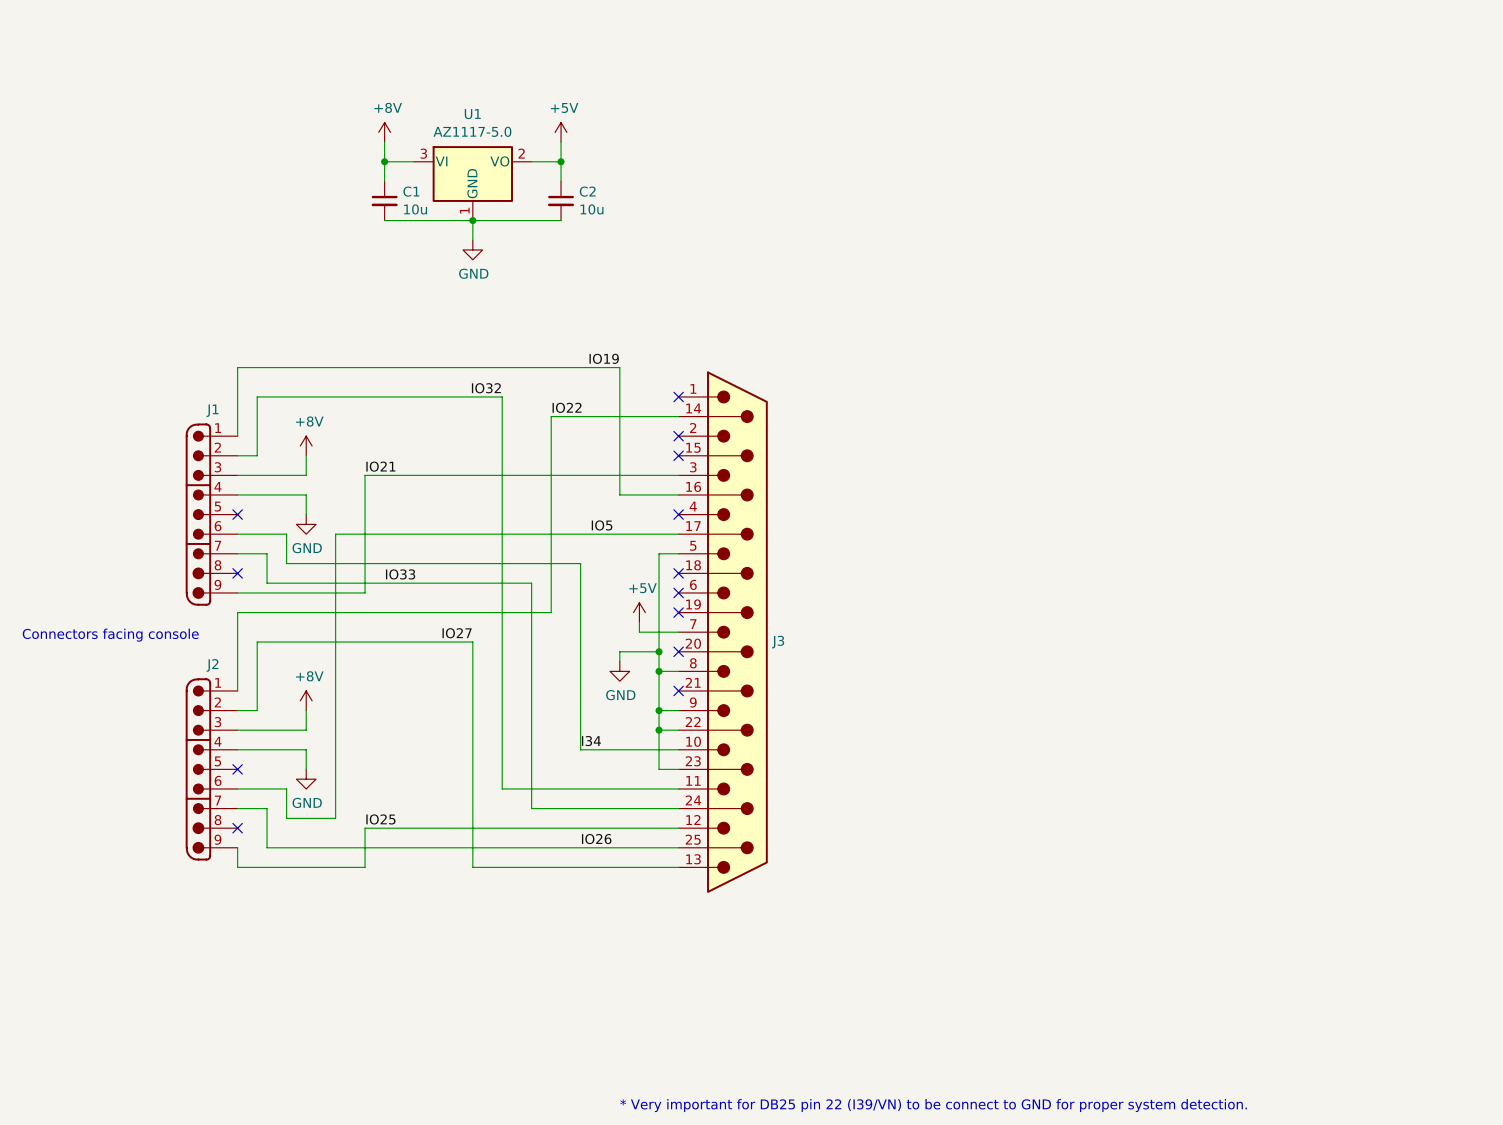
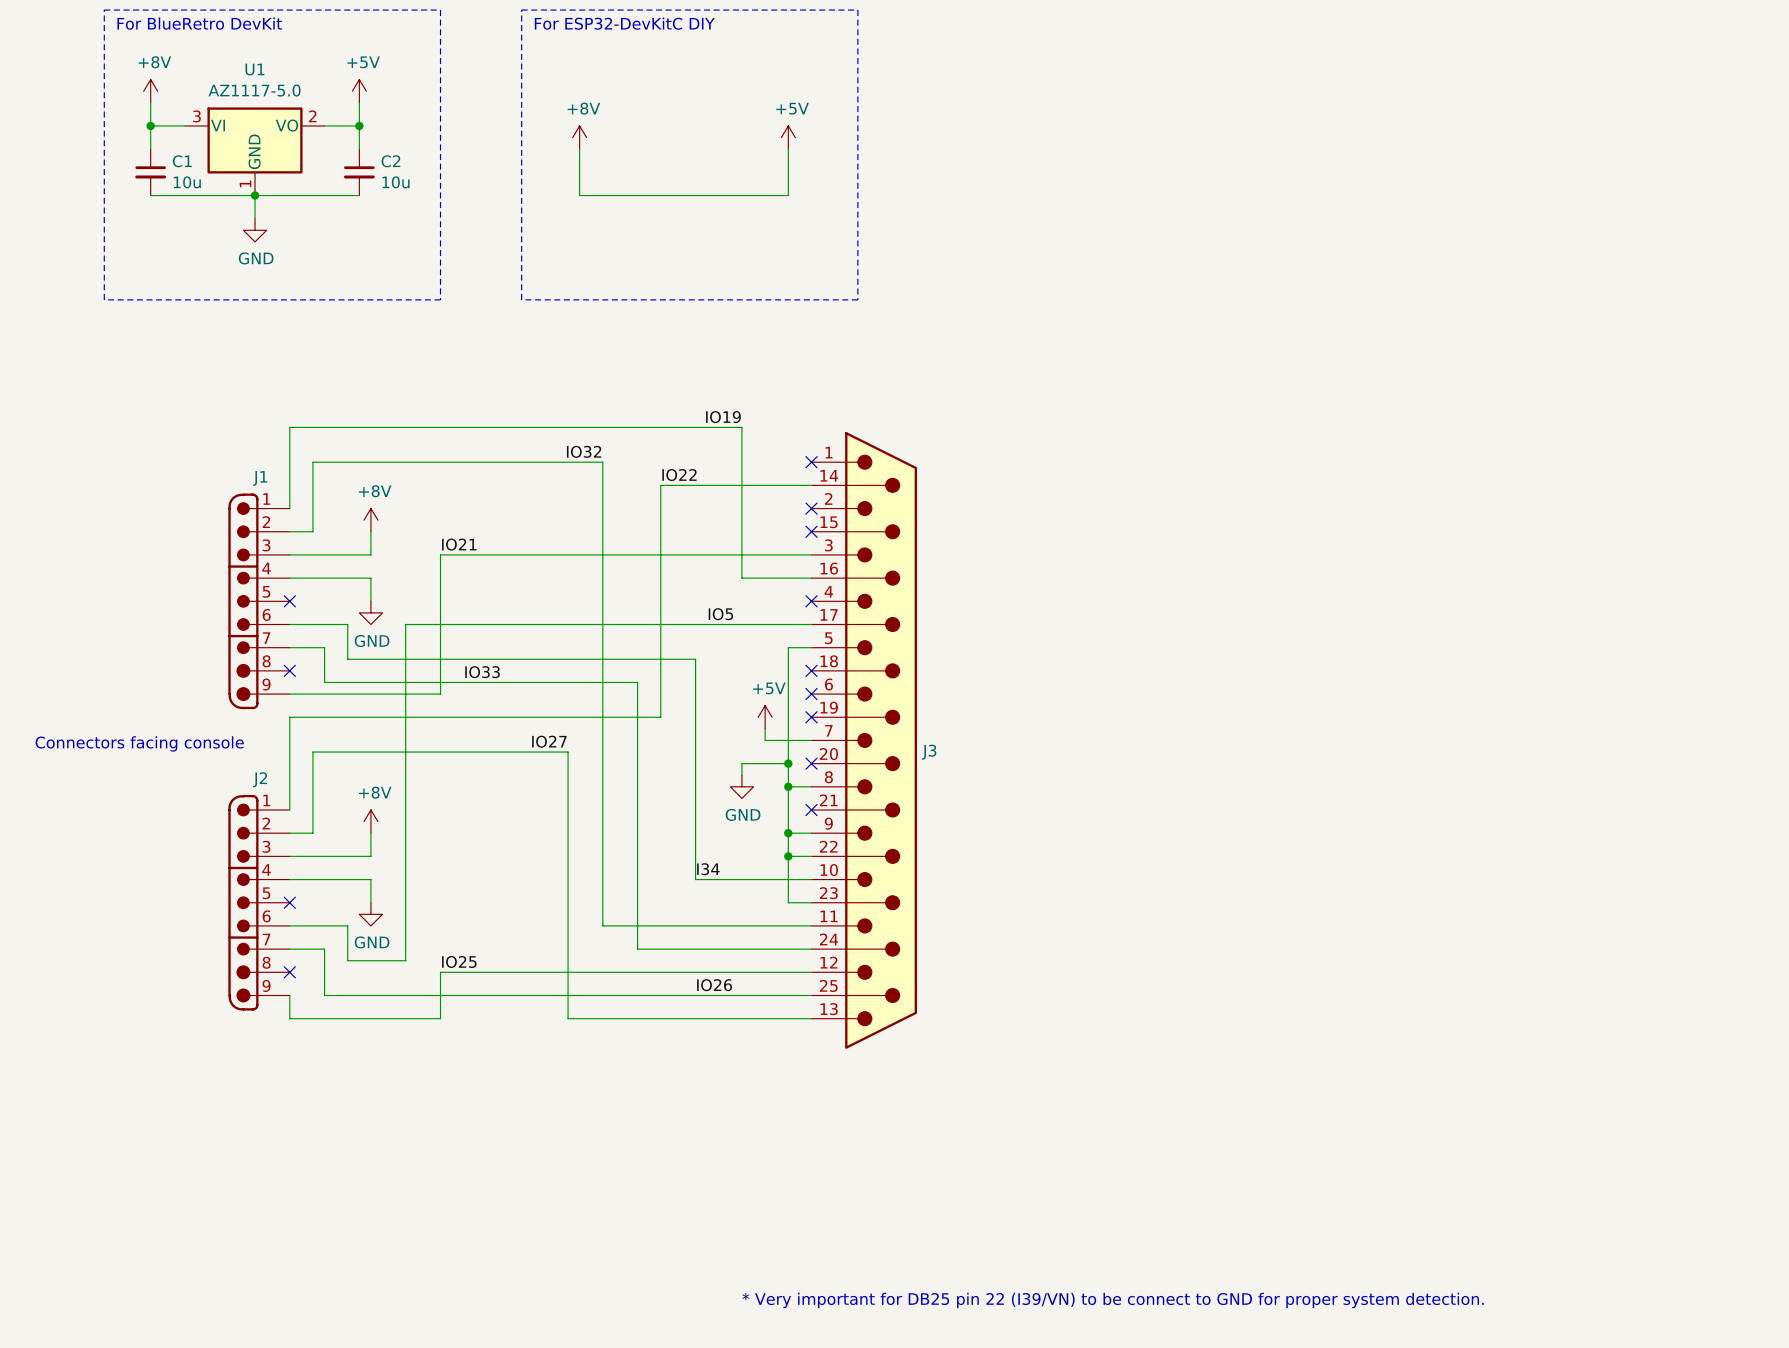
line: none -> (104, 10) (104, 299) (440, 299) (440, 10) (104, 10)
line: none -> (521, 10) (857, 10) (857, 299) (521, 299) (521, 10)
text: none -> For BlueRetro DevKit (199, 23)
text: none -> For ESP32-DevKitC DIY (624, 23)
power symbol: none -> +8V (150, 91)
power symbol: none -> +5V (359, 91)
wire: none -> (150, 102) (150, 149)
wire: none -> (150, 125) (185, 125)
junction: none -> (150, 125)
junction: none -> (359, 125)
power symbol position: +8V (384, 132) -> +8V (579, 137)
wire: none -> (579, 149) (579, 195) (788, 195) (788, 149)
power symbol position: +5V (561, 132) -> +5V (788, 137)
wire: (384, 142) (384, 181) -> (359, 102) (359, 149)
wire: (561, 142) (561, 181) -> none
wire: (384, 161) (414, 161) -> (324, 125) (359, 125)
junction: (384, 161) -> none
wire: (531, 161) (561, 161) -> none
junction: (561, 161) -> none
wire: none -> (150, 195) (359, 195)
wire: none -> (255, 195) (255, 218)
junction: none -> (255, 195)
U1 position: (472, 183) -> (255, 151)
power symbol: none -> GND (255, 230)
C1 position: (384, 200) -> (150, 172)
C2 position: (561, 200) -> (359, 172)
wire: (384, 220) (561, 220) -> none
wire: (472, 220) (472, 240) -> none
junction: (472, 220) -> none
power symbol: GND (472, 249) -> none

